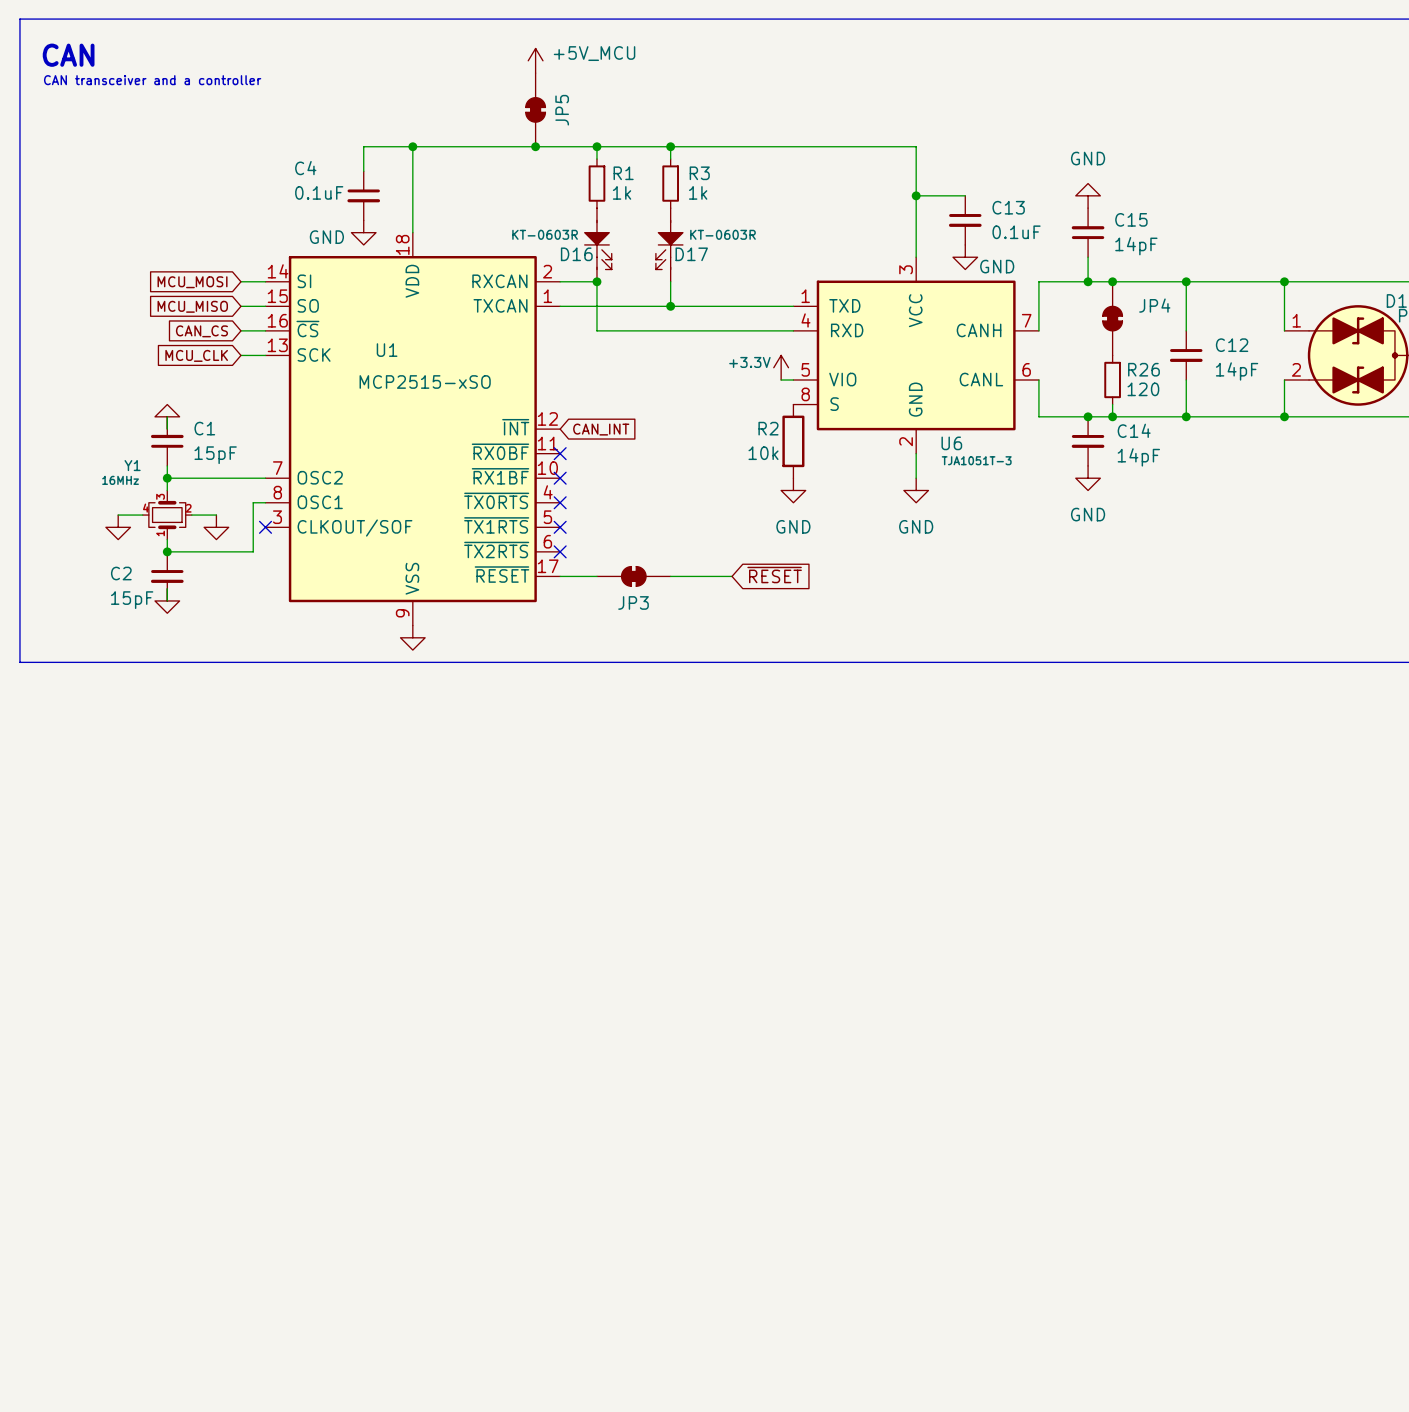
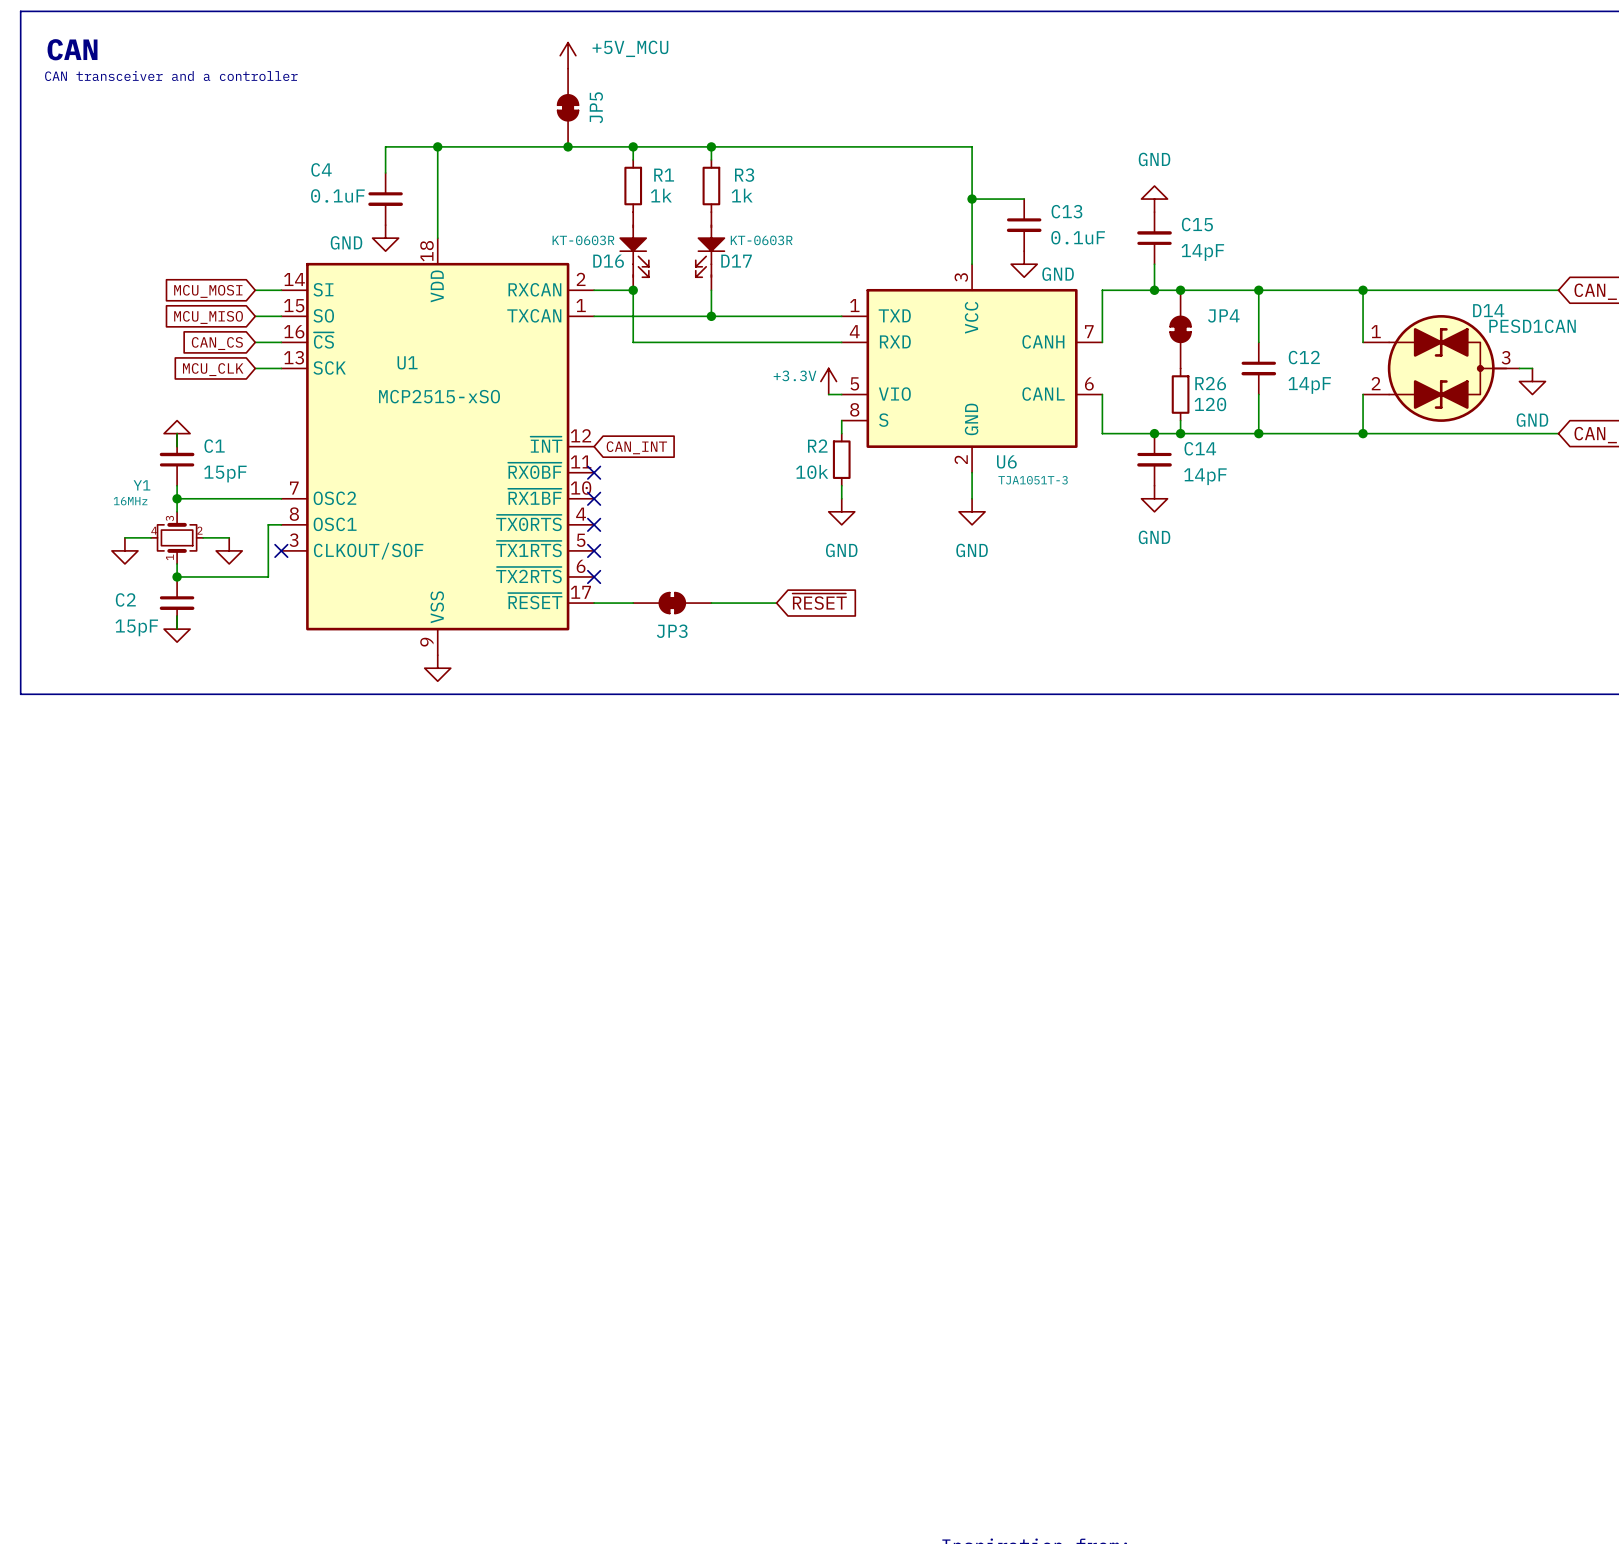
R2 symbol: [782, 404, 805, 479] -> [832, 433, 851, 486]

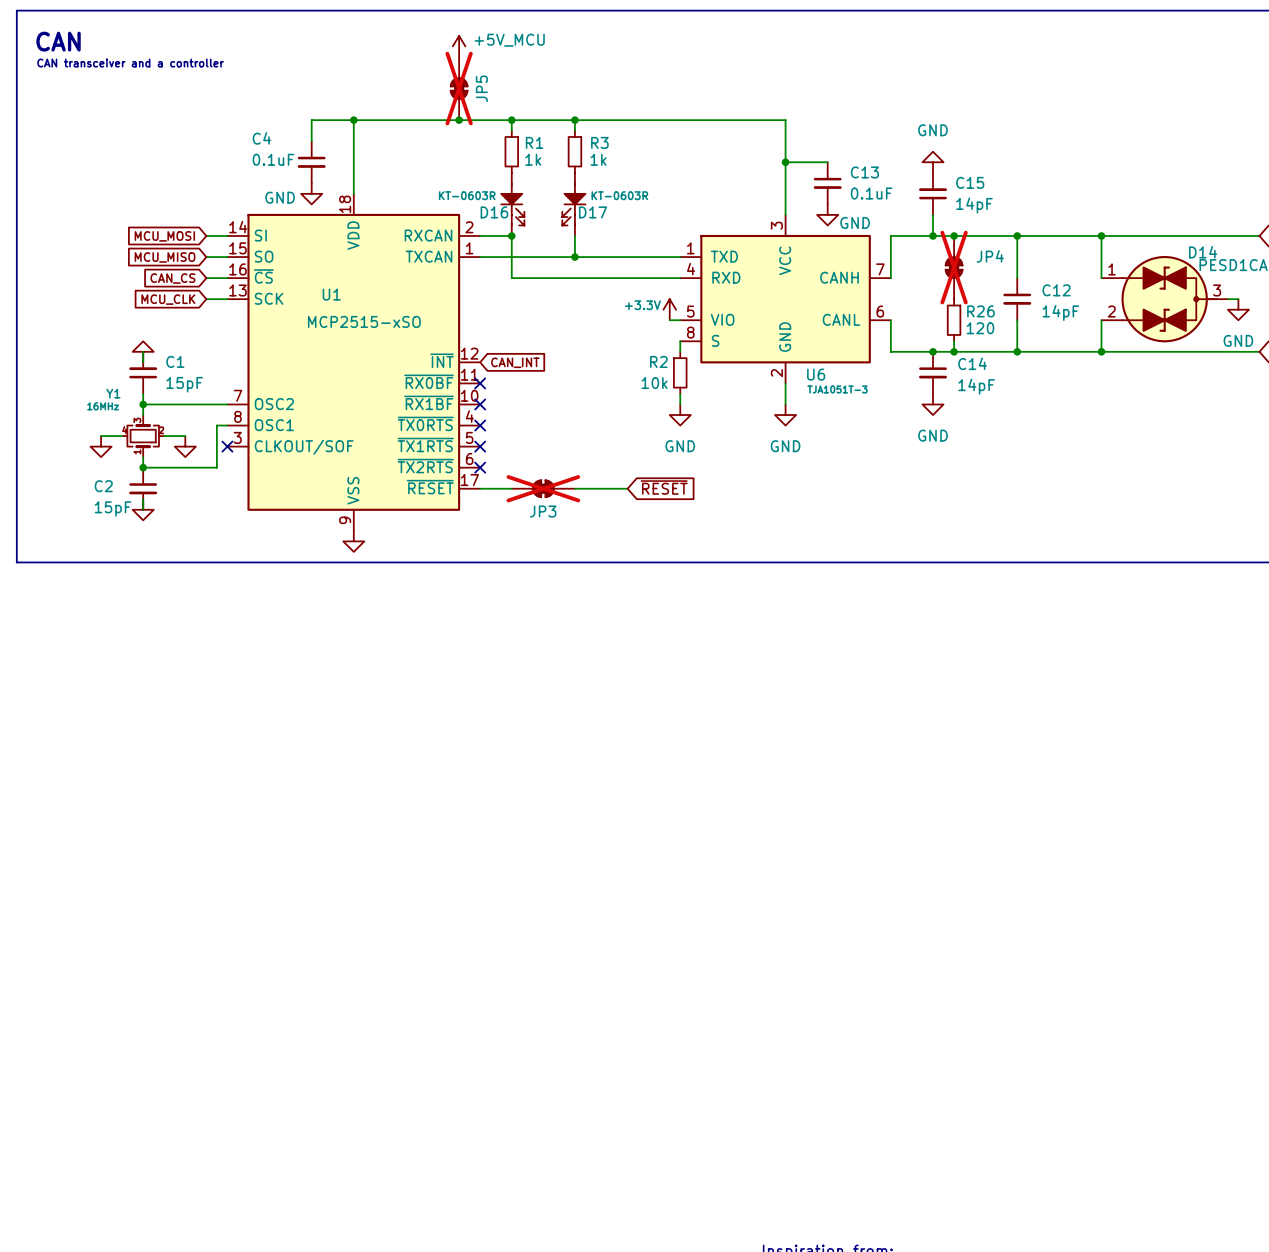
JP5 do-not-place cross: none -> (459, 88)
JP4 do-not-place cross: none -> (954, 267)
JP3 do-not-place cross: none -> (543, 488)

